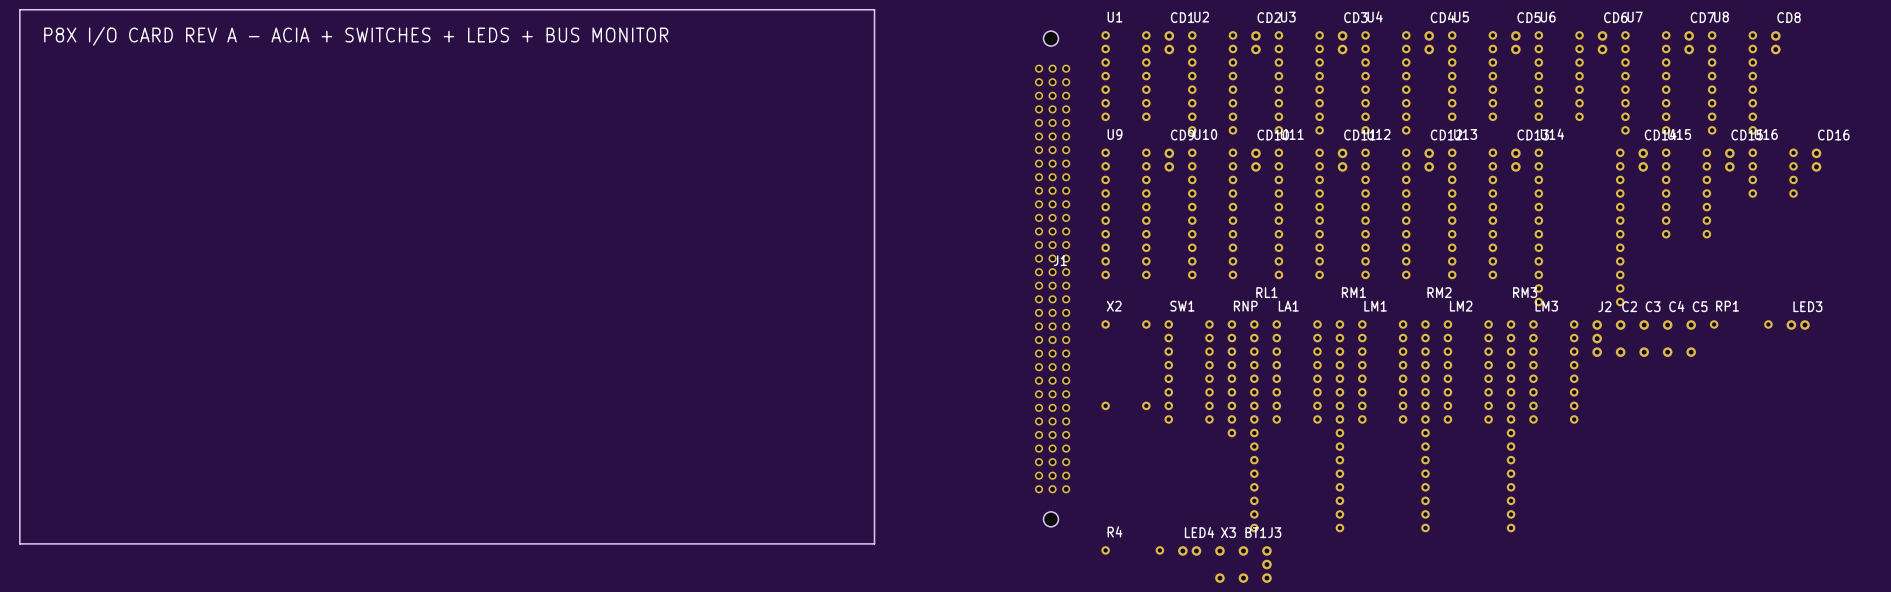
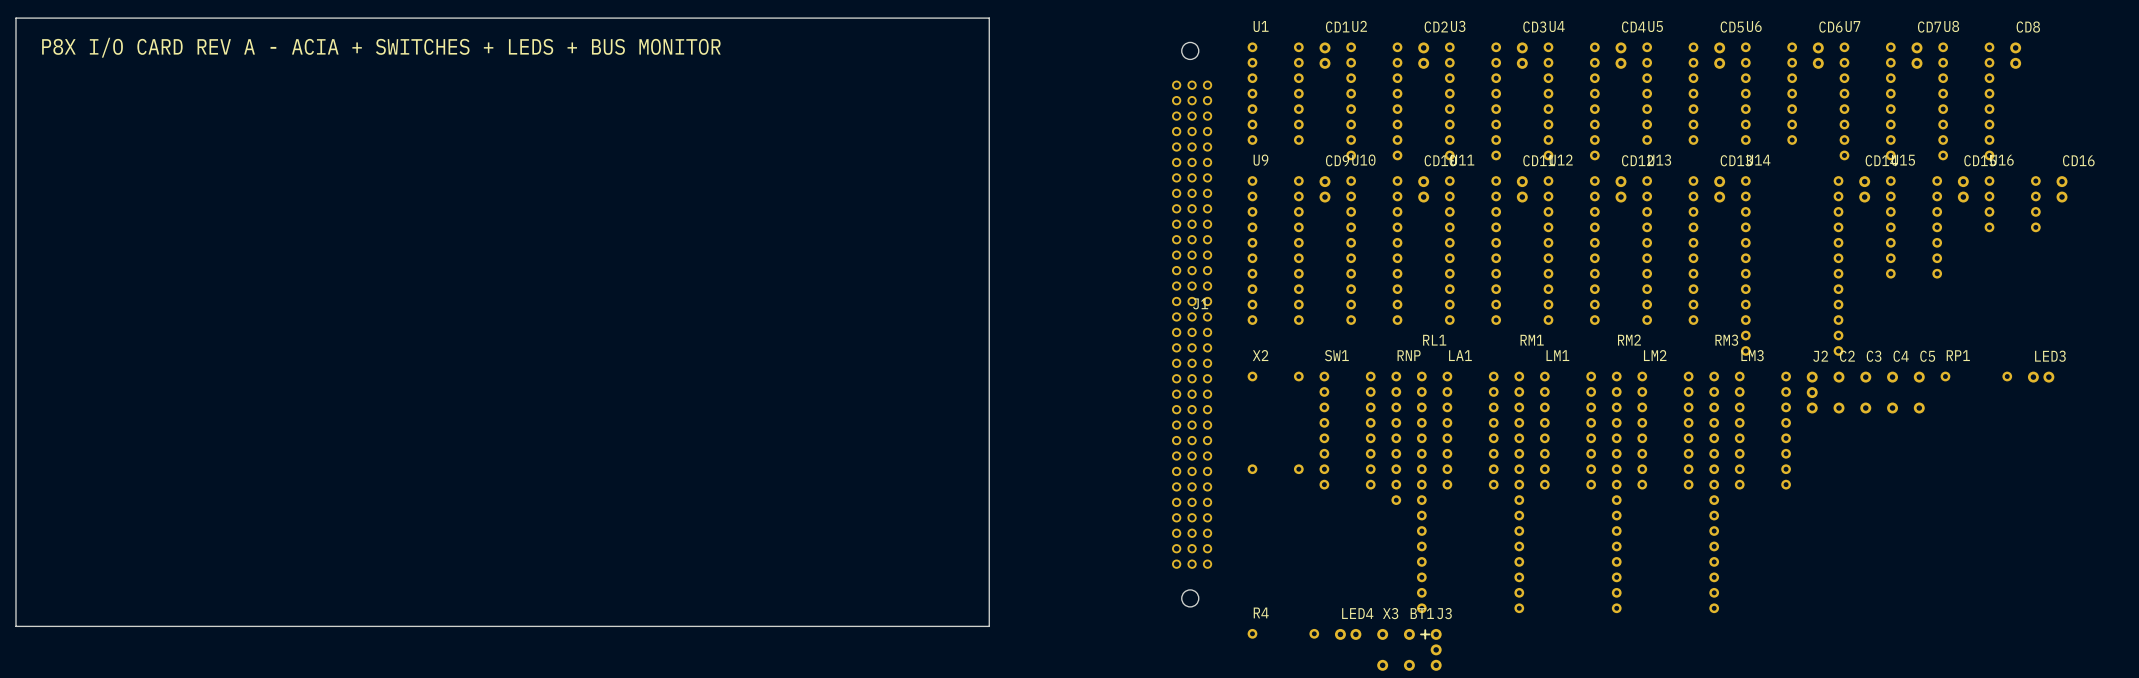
BT1 footprint: [1238, 546, 1249, 583] -> [1403, 628, 1431, 671]

